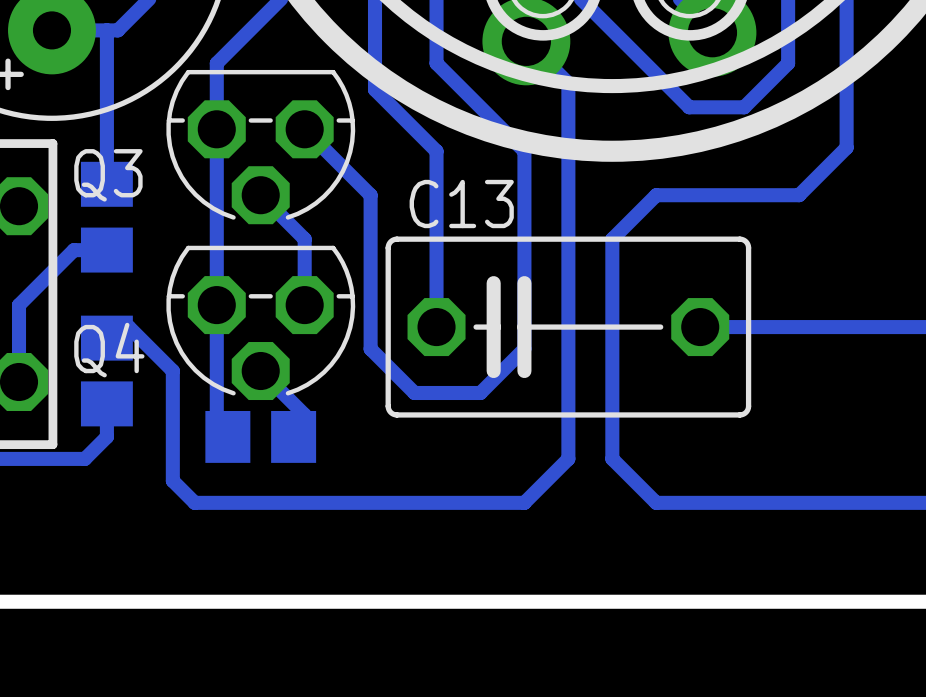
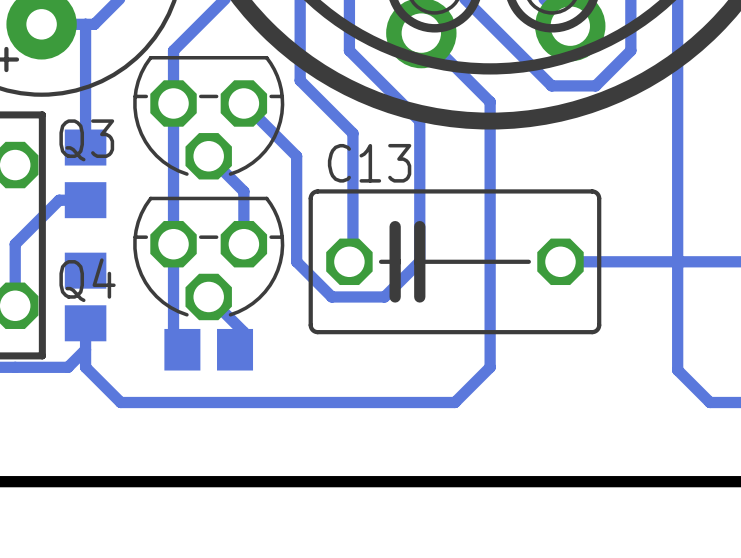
bottom track: (568, 83) (568, 458) (524, 502) -> (454, 66) (490, 101) (490, 191)
bottom track: (375, 89) (436, 151) (436, 327) -> (300, 71) (300, 80) (352, 133) (352, 244)
bottom track: (846, 147) (799, 195) (656, 195) (612, 239) -> (677, 118) (677, 370) (710, 402)
bottom track: (370, 327) (370, 349) (414, 392) (480, 392) (524, 349) (524, 327) -> (296, 261) (331, 296) (384, 296) (419, 261)
bottom track: (106, 338) (106, 327) (128, 327) (172, 371) (172, 480) (194, 502) -> (85, 349) (85, 367) (120, 402) (155, 402)
bottom track: (612, 458) (656, 502) (887, 502) -> (490, 367) (454, 402) (419, 402)

